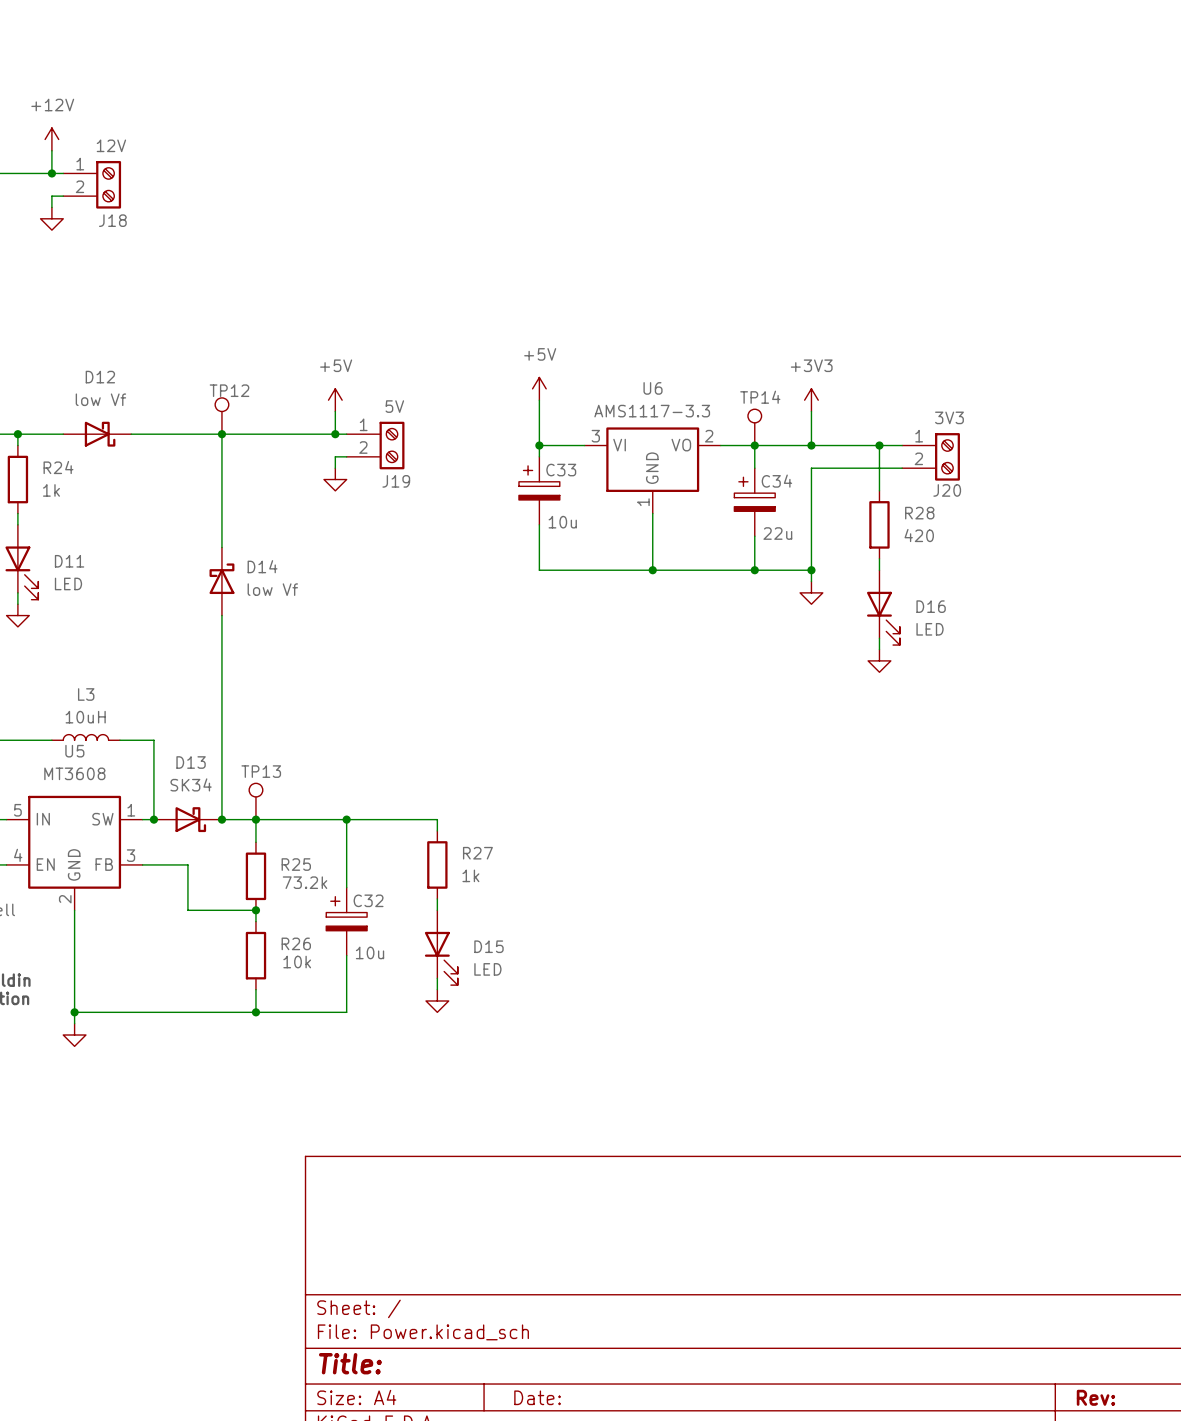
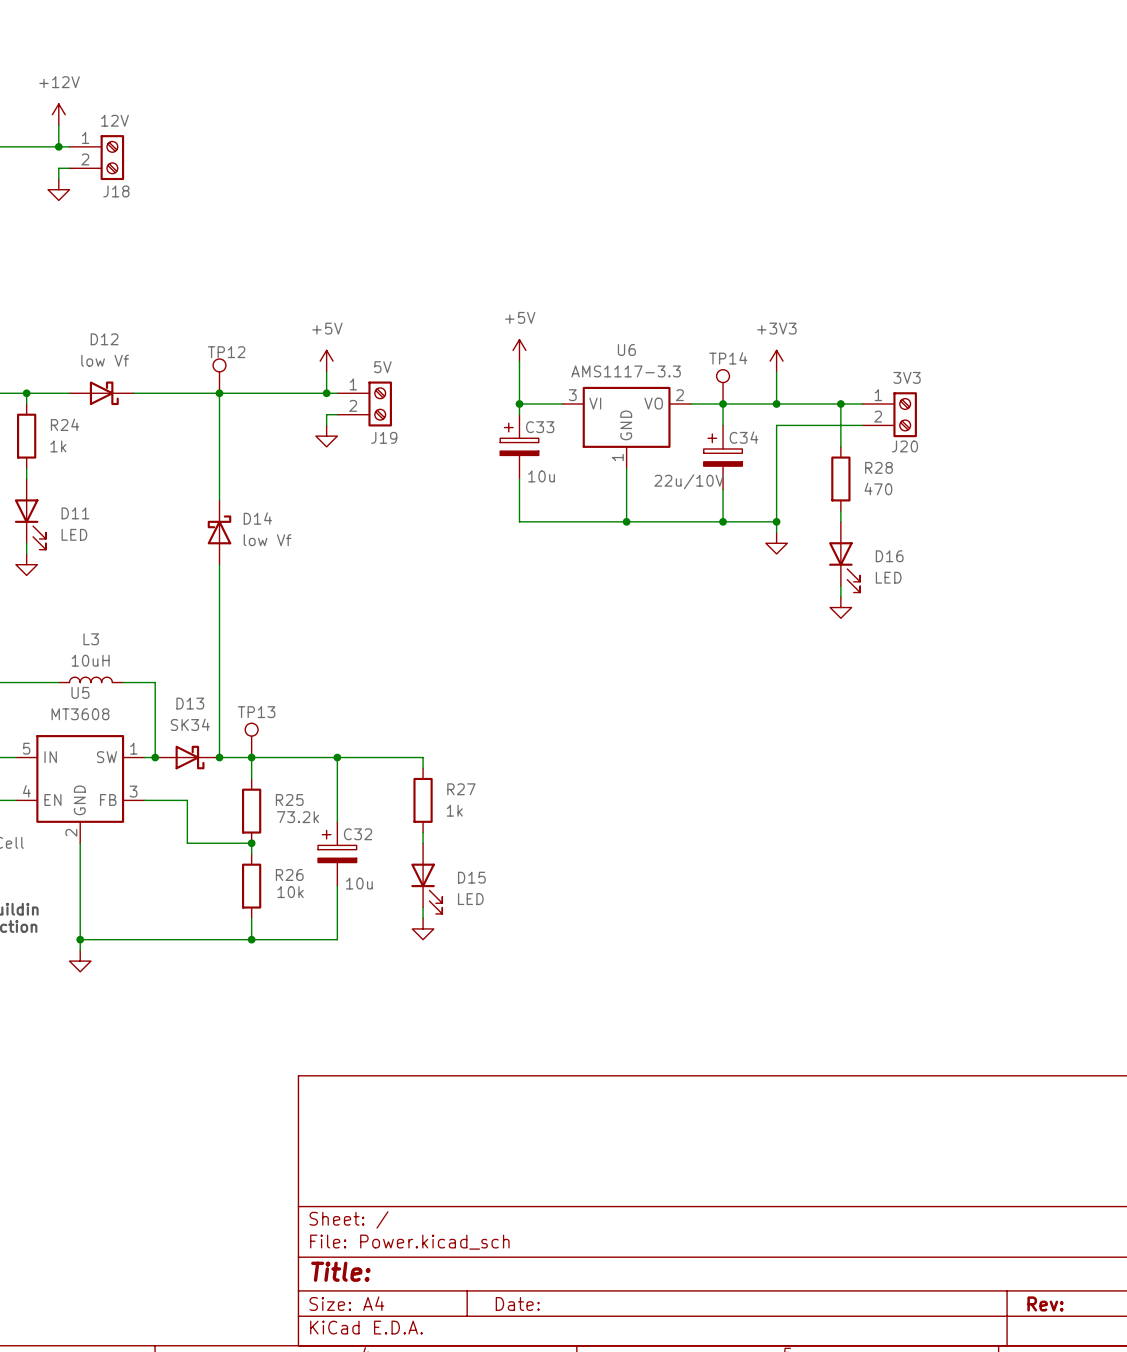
C34 value: 22u (777, 533) -> 22u/10V (689, 481)
R28 value: 420 (919, 535) -> 470 (878, 489)

